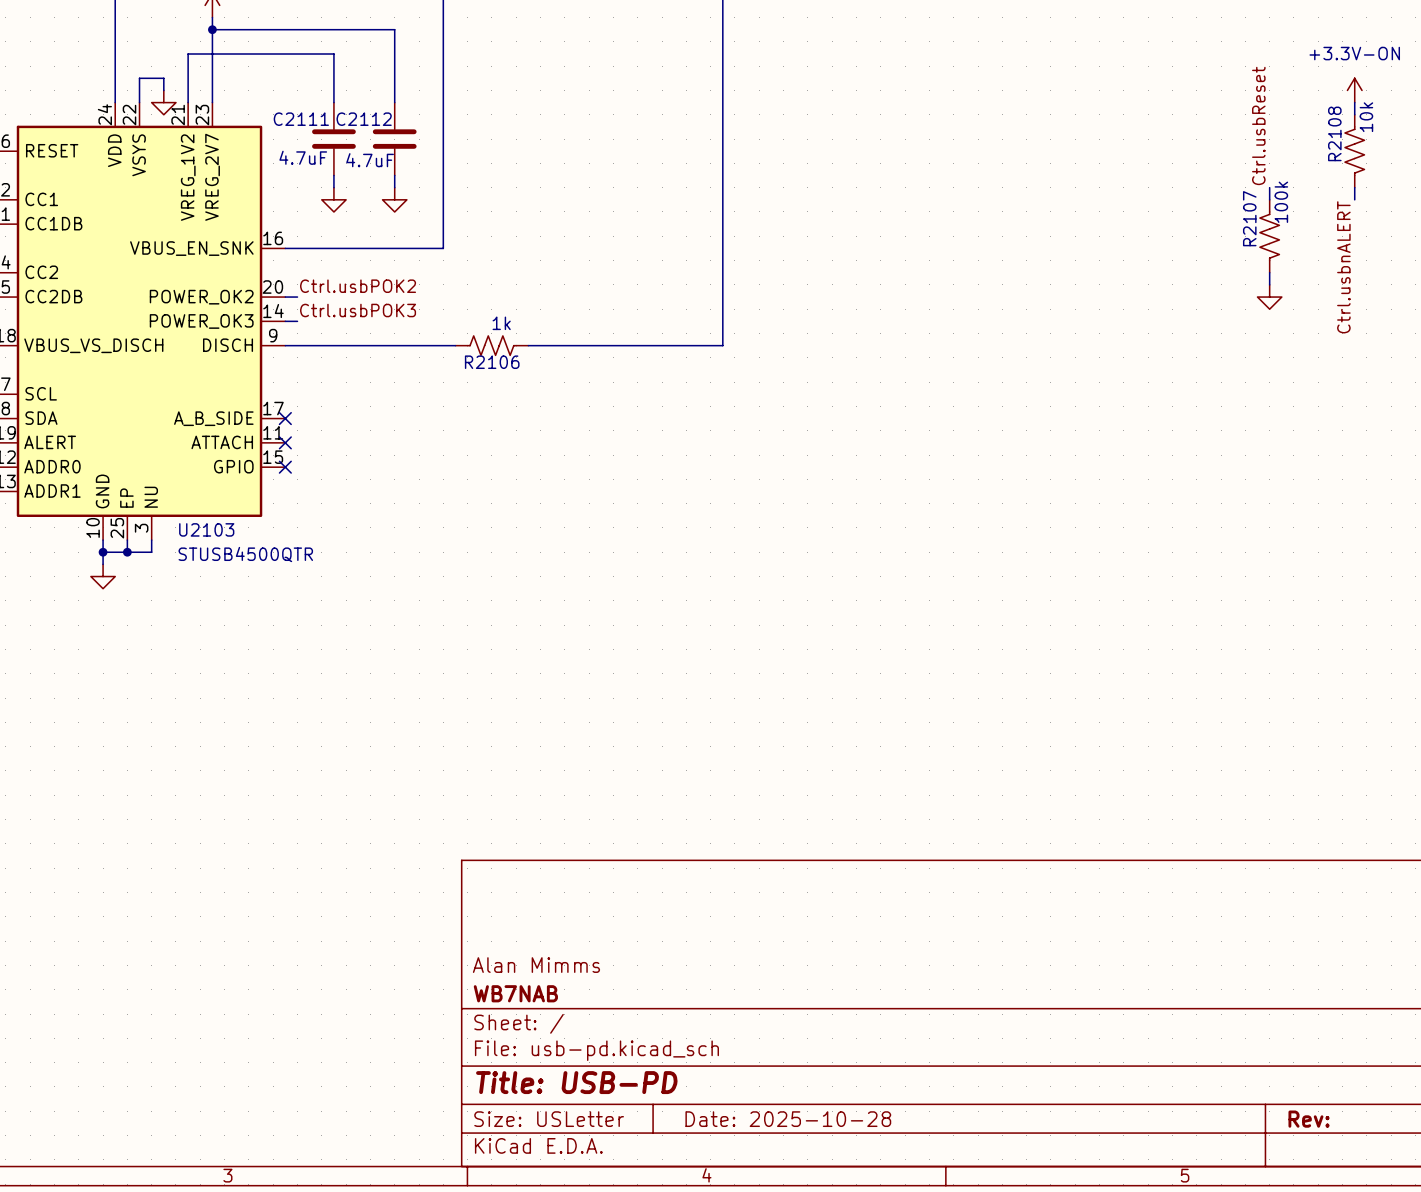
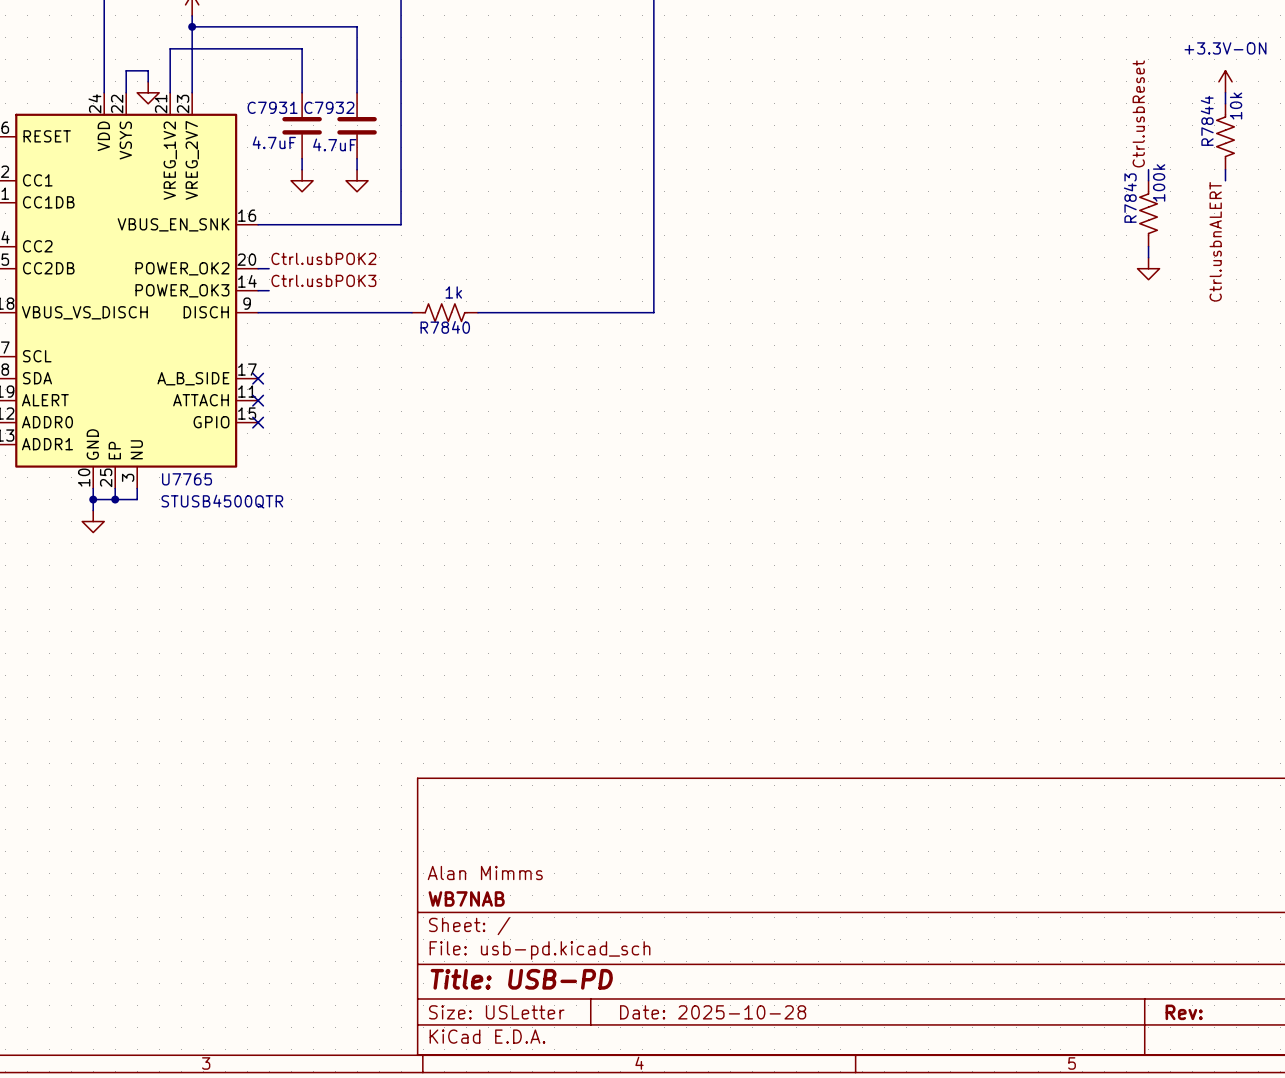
C2111 name: C2111 (301, 119) -> C7931 (272, 107)
C2112 name: C2112 (364, 119) -> C7932 (329, 107)
R2108 name: R2108 (1334, 133) -> R7844 (1207, 120)
R2107 name: R2107 (1249, 218) -> R7843 (1130, 198)
R2106 name: R2106 (492, 362) -> R7840 (445, 327)
U2103 name: U2103 (206, 529) -> U7765 (187, 479)

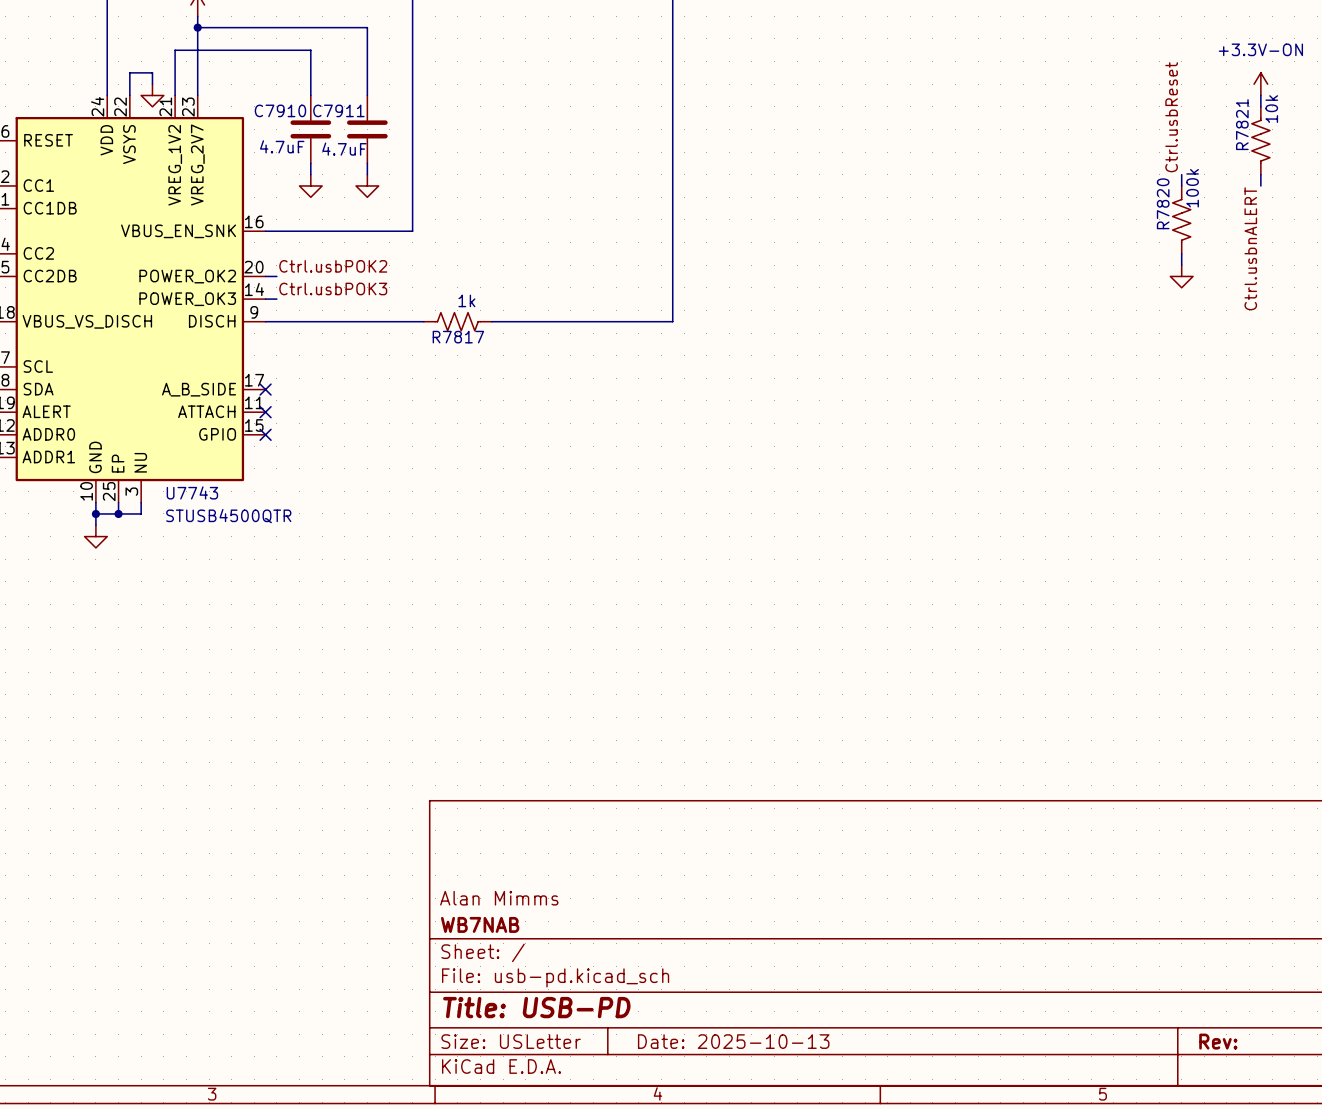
C7931 name: C7931 (272, 107) -> C7910 (280, 110)
C7932 name: C7932 (329, 107) -> C7911 (338, 110)
R7844 name: R7844 (1207, 120) -> R7821 (1242, 124)
R7843 name: R7843 (1130, 198) -> R7820 (1163, 203)
R7840 name: R7840 (445, 327) -> R7817 (458, 337)
U7765 name: U7765 (187, 479) -> U7743 (192, 492)
title block: Date: 2025-10-28 (713, 1012) -> Date: 2025-10-13 (733, 1041)

